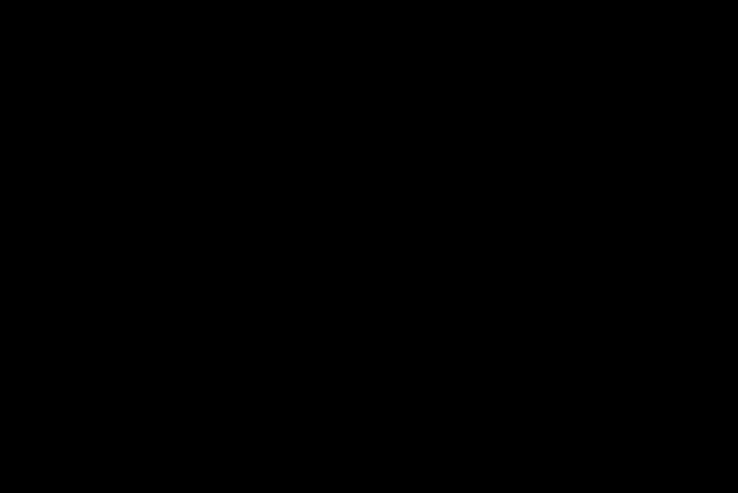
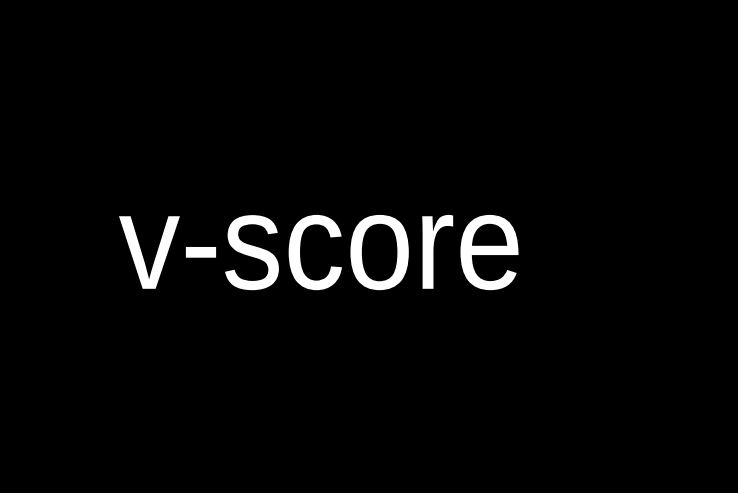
text: none -> v-score (318, 252)

